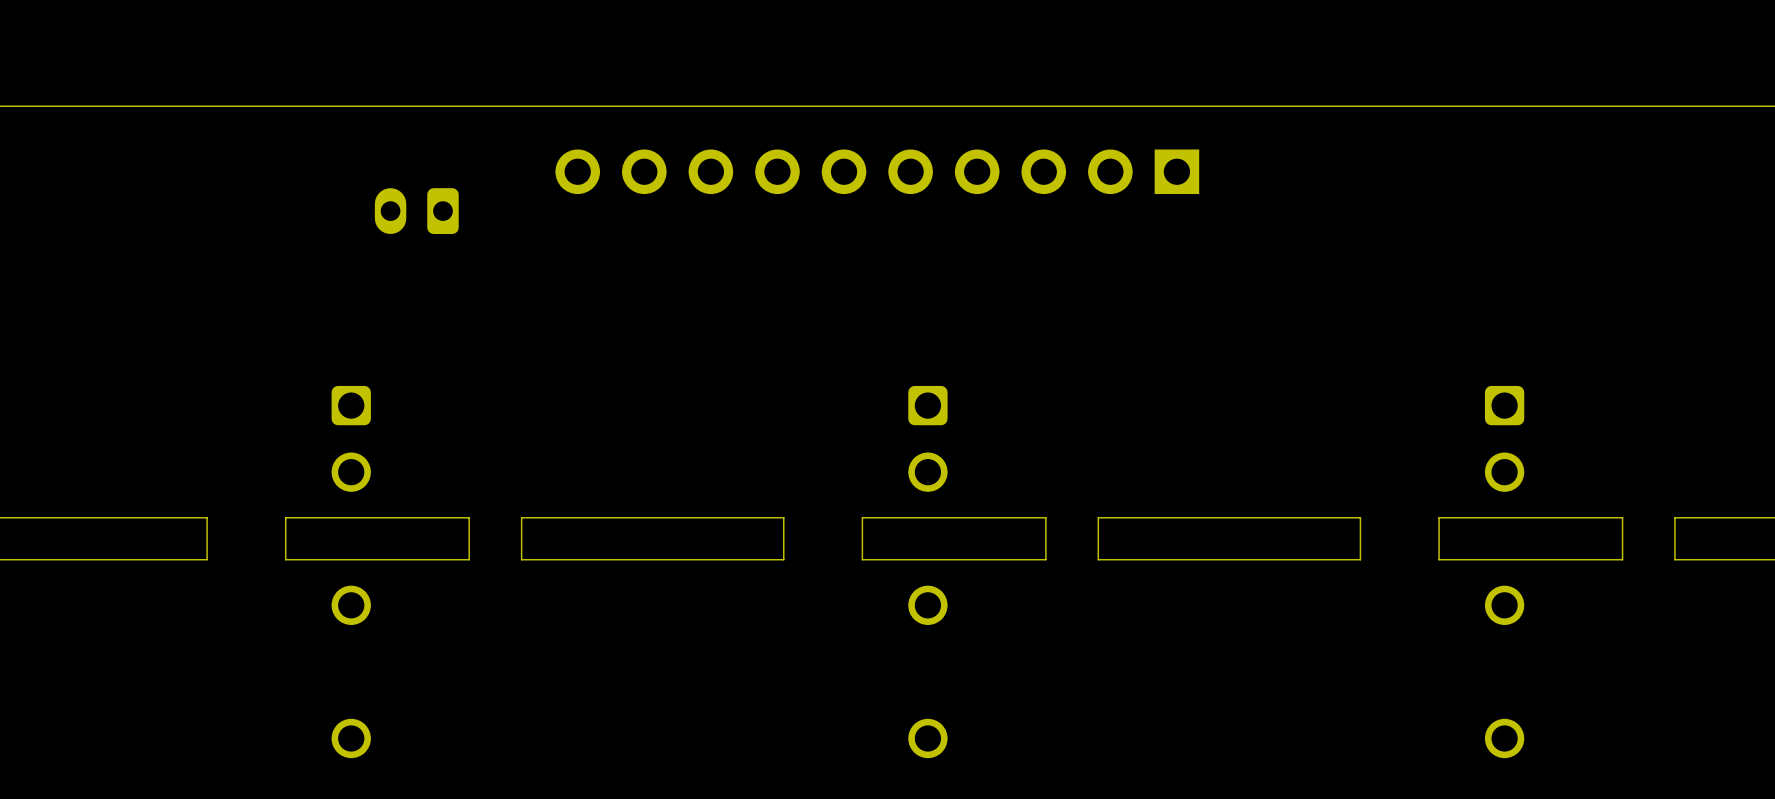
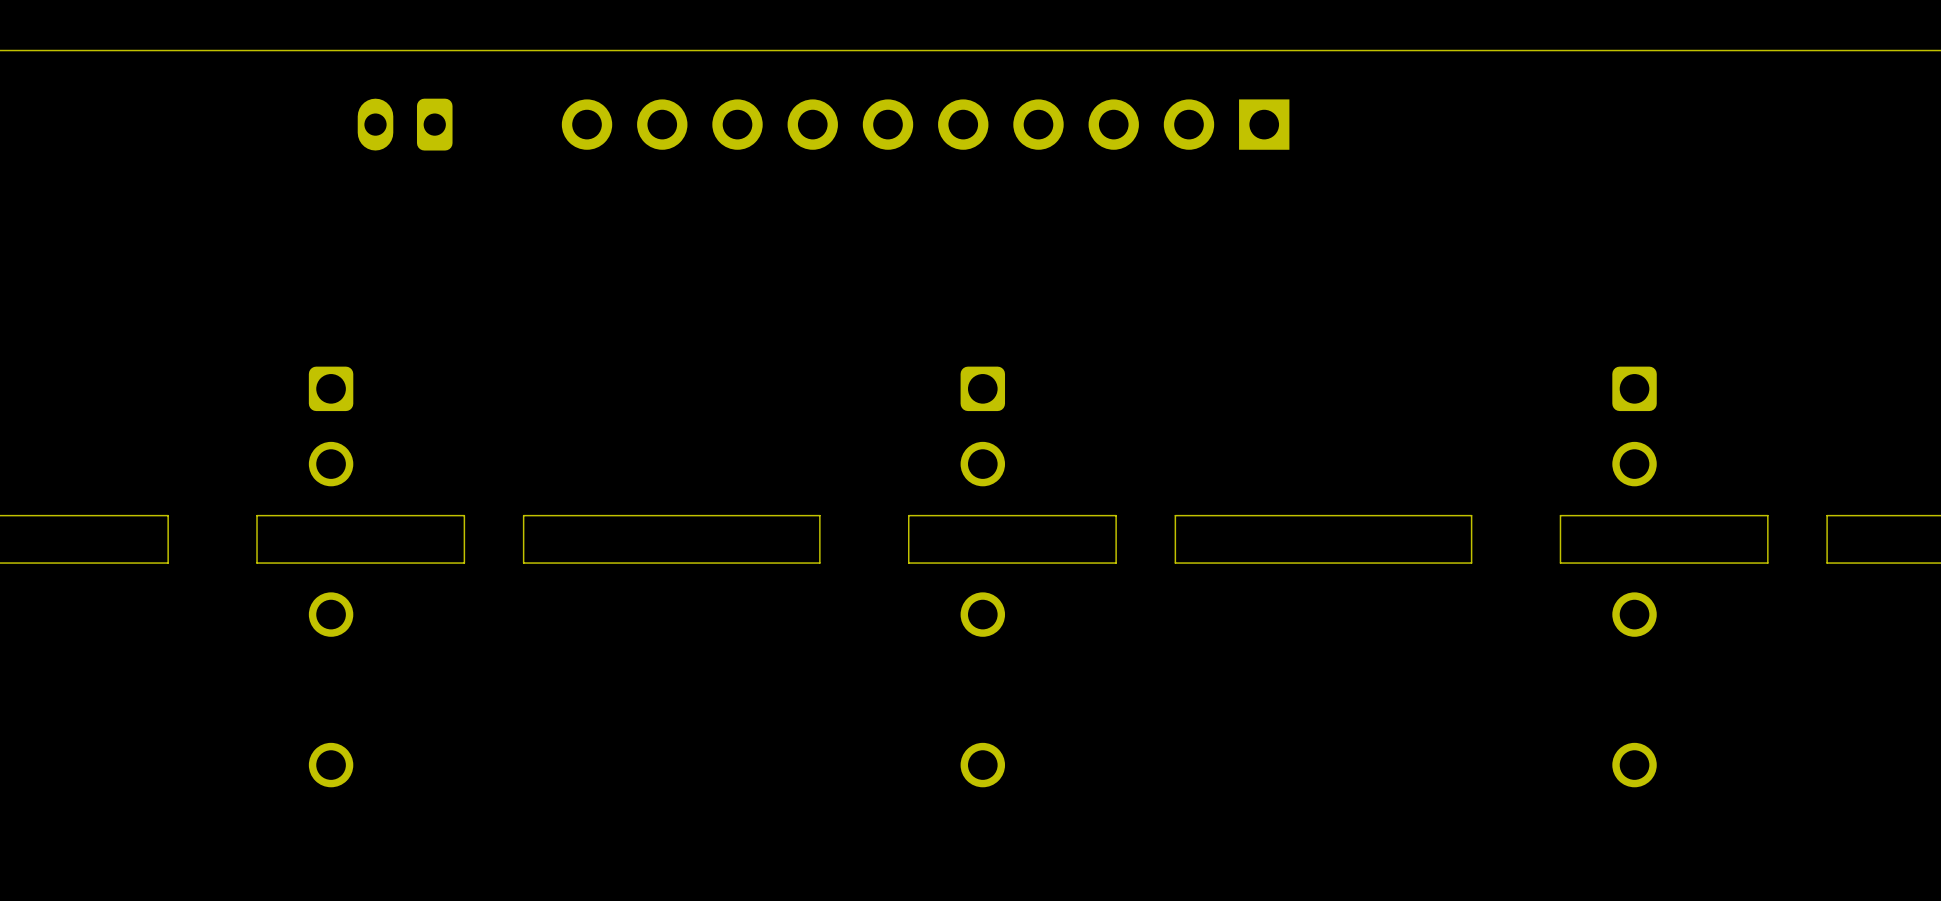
part position: (416, 211) -> (405, 124)

